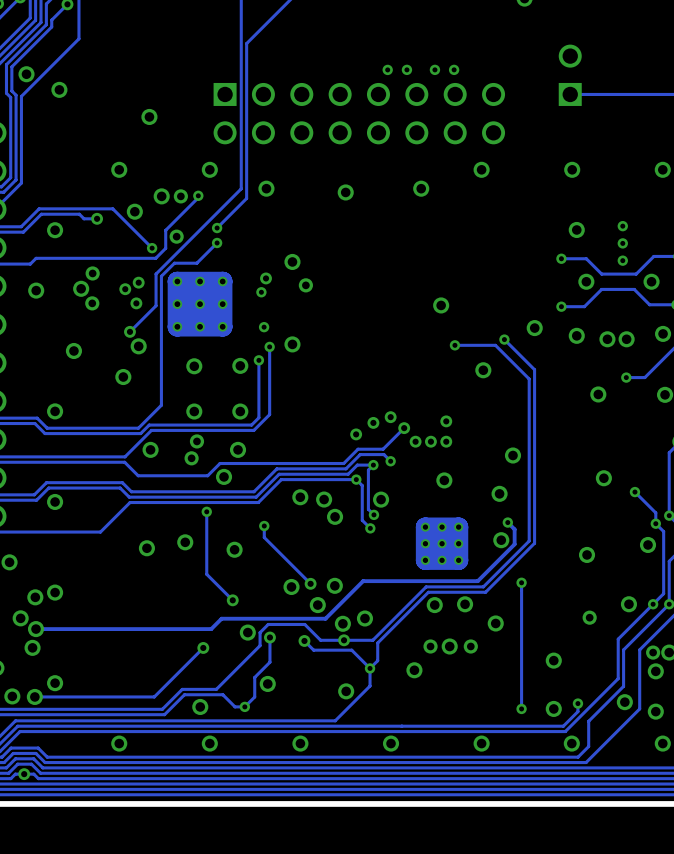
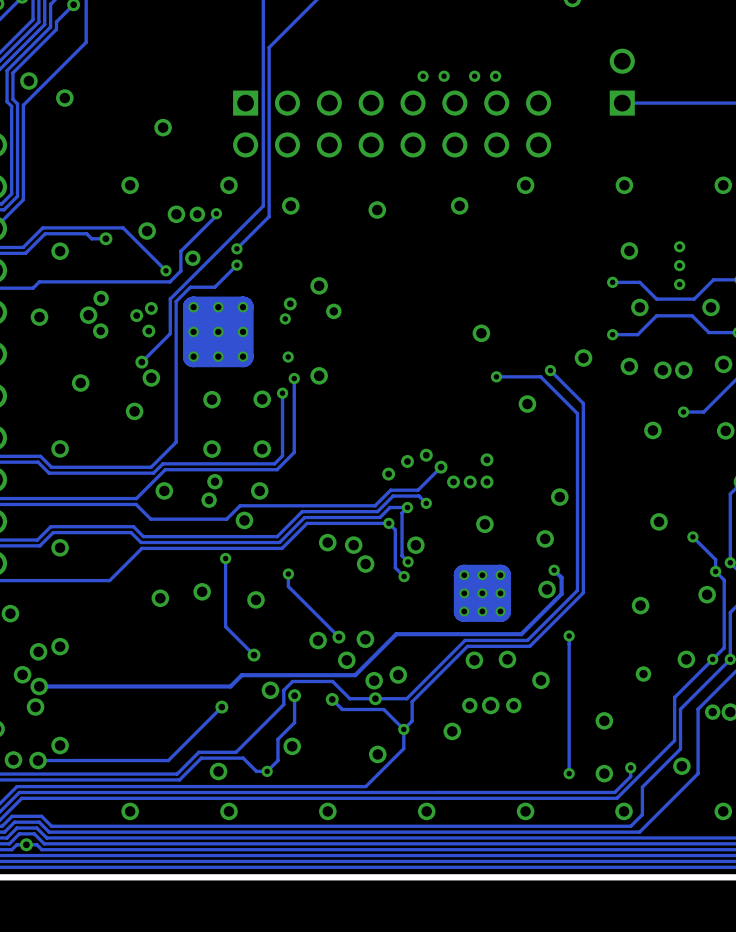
via: (655, 671) -> none
via: (655, 711) -> none

